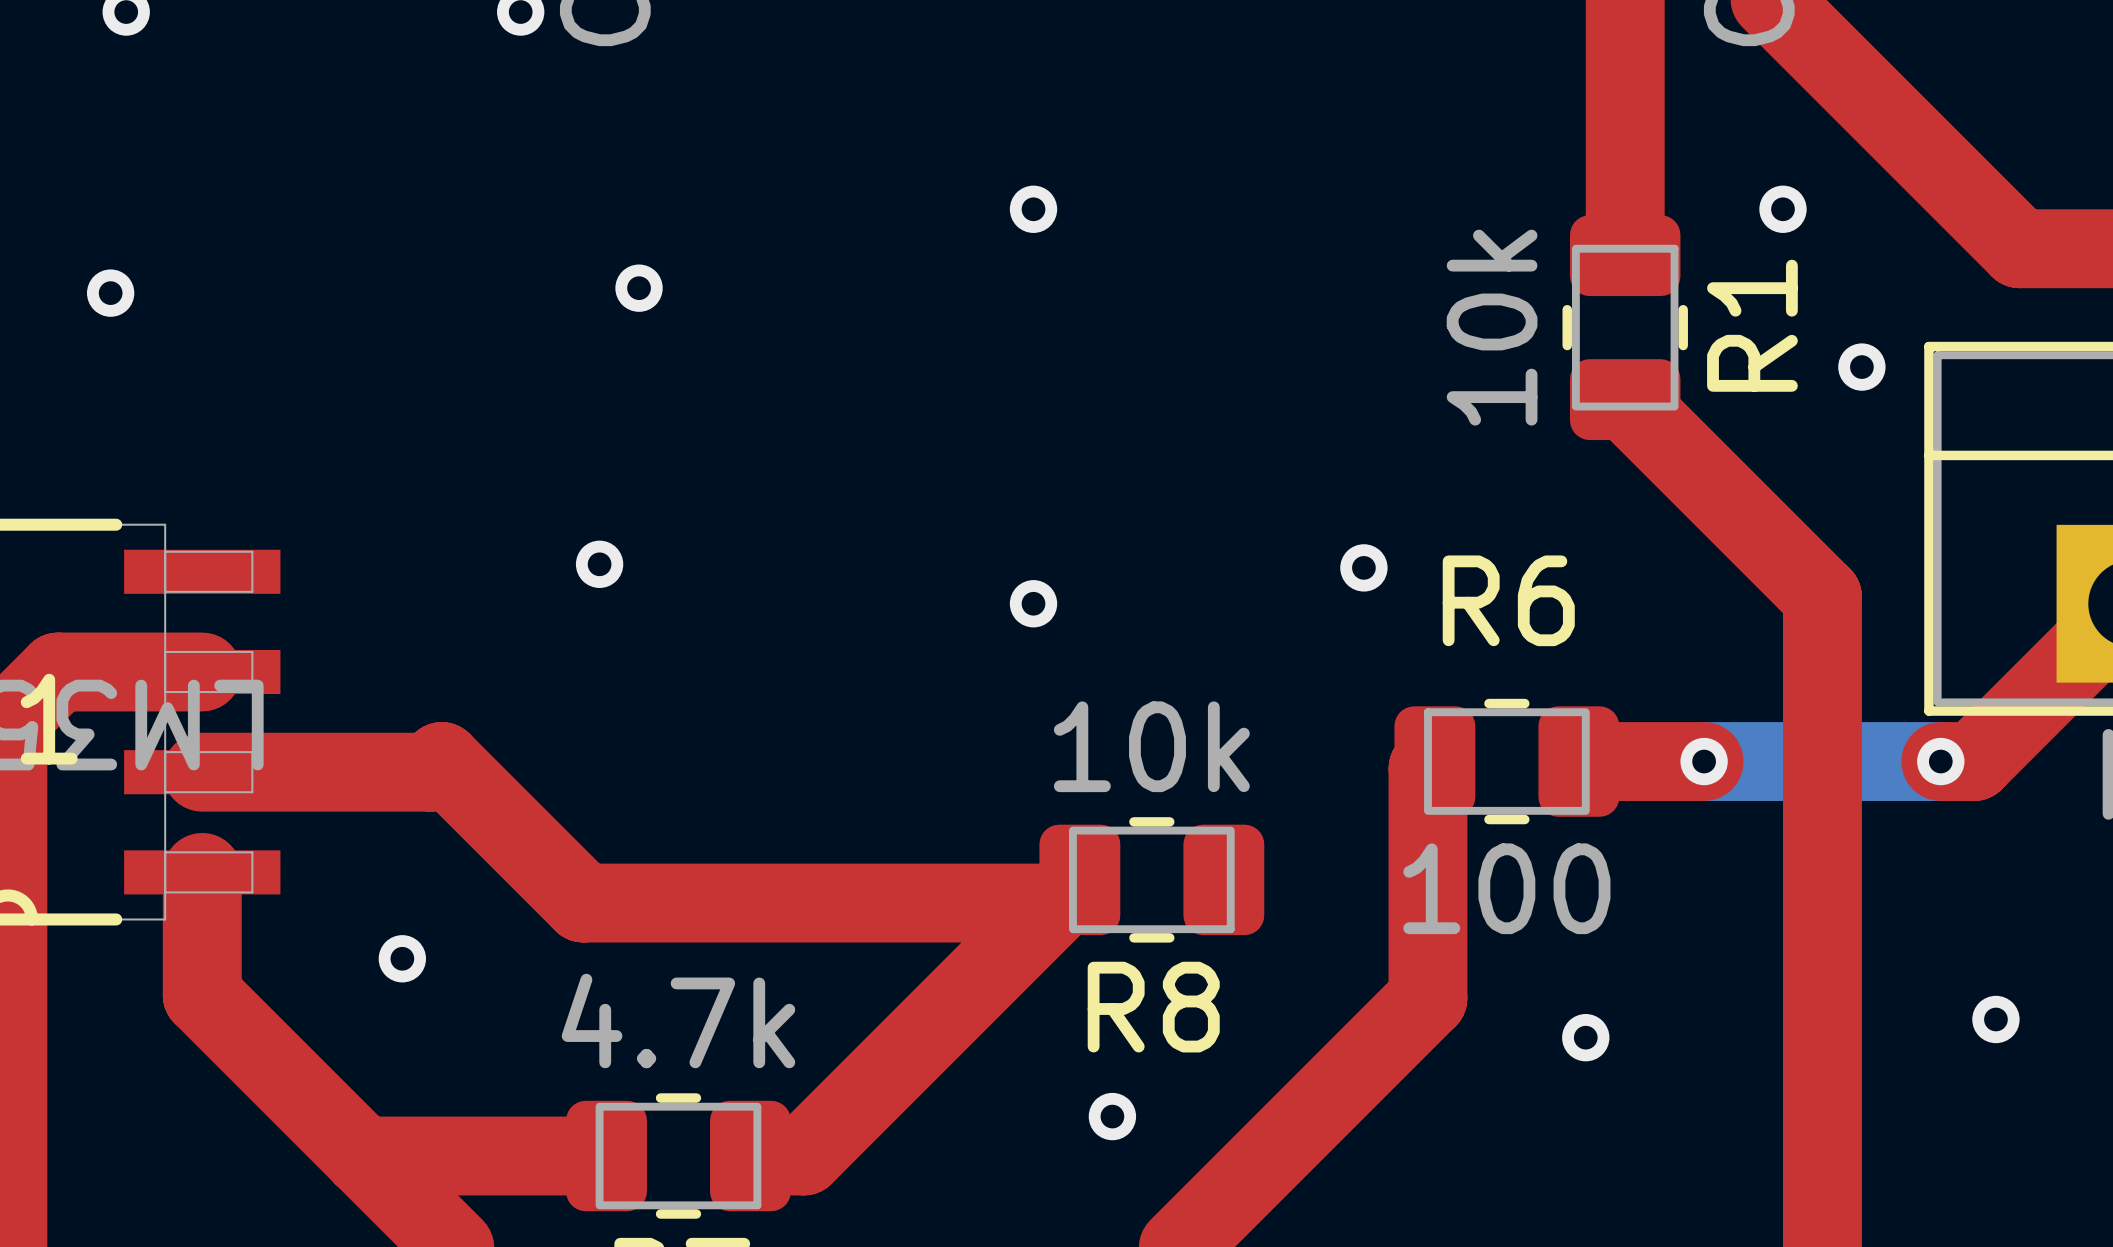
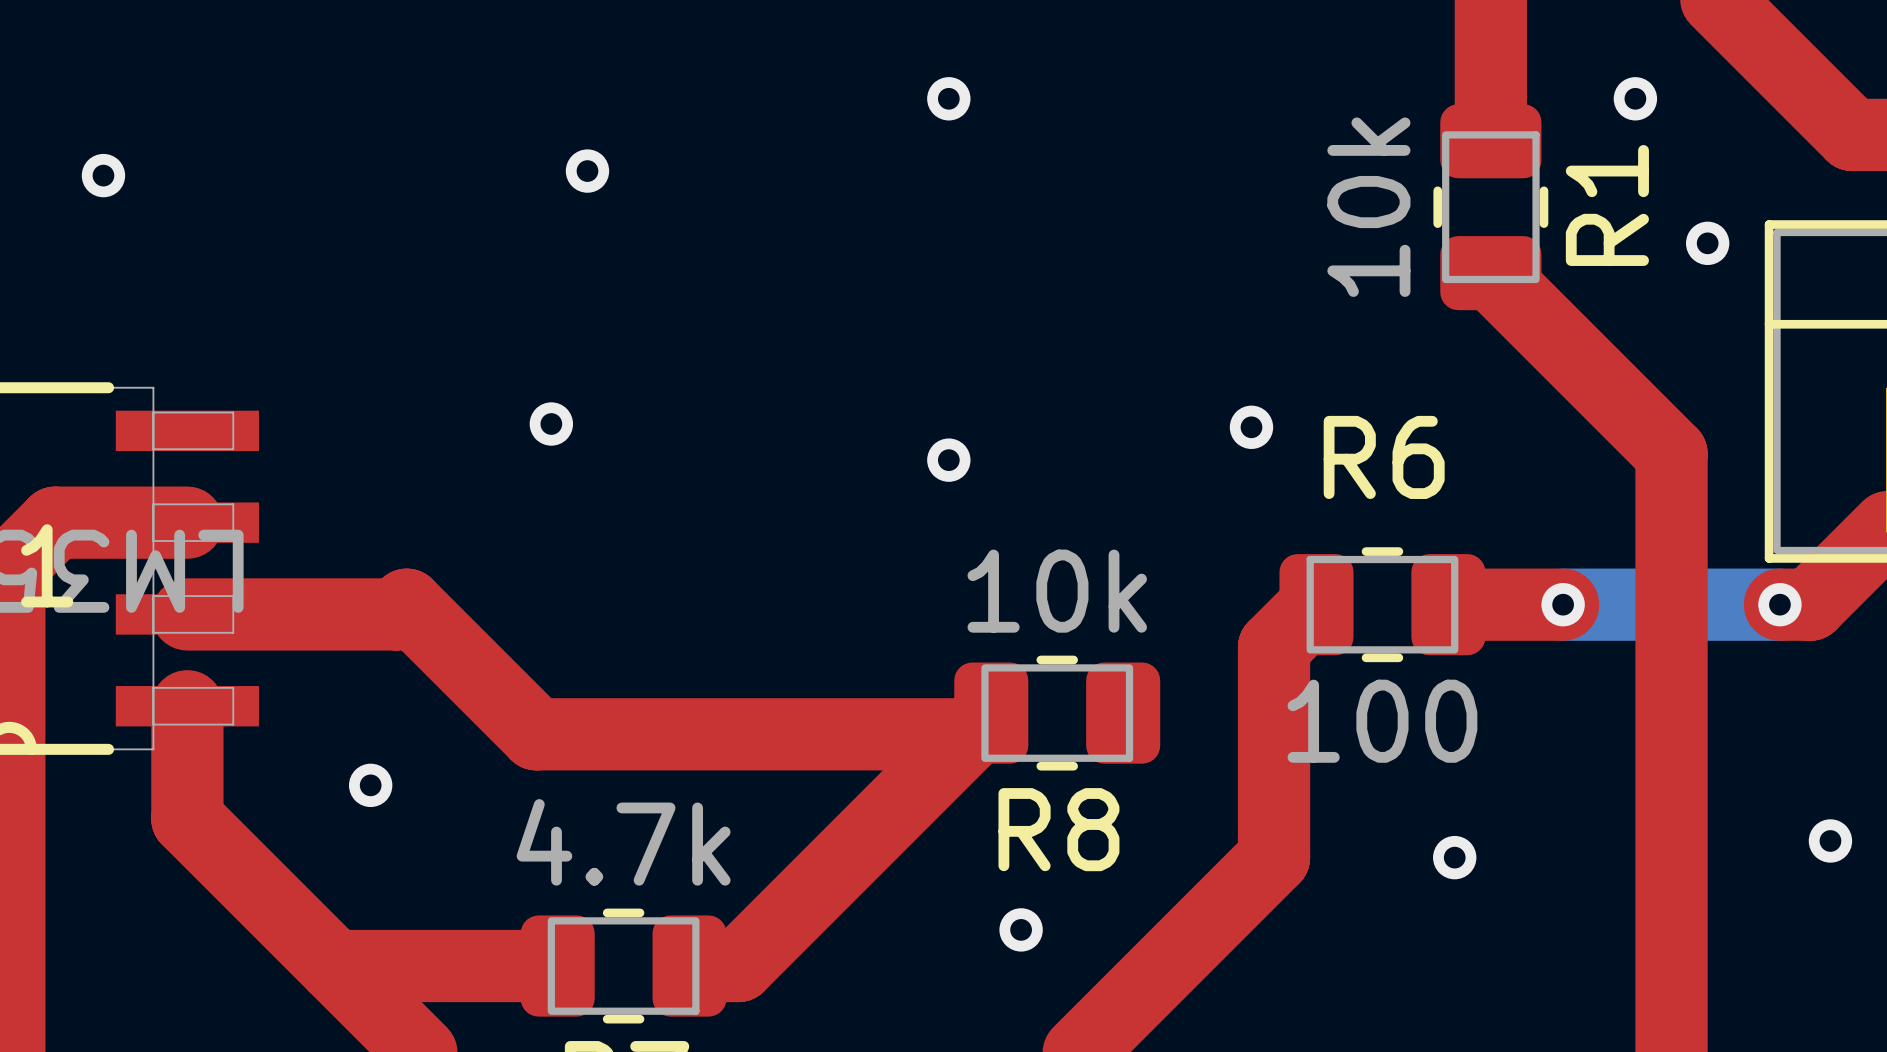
top track: (1427, 768) (1427, 998) (1388, 1037) -> (1310, 611) (1274, 647) (1274, 857)

